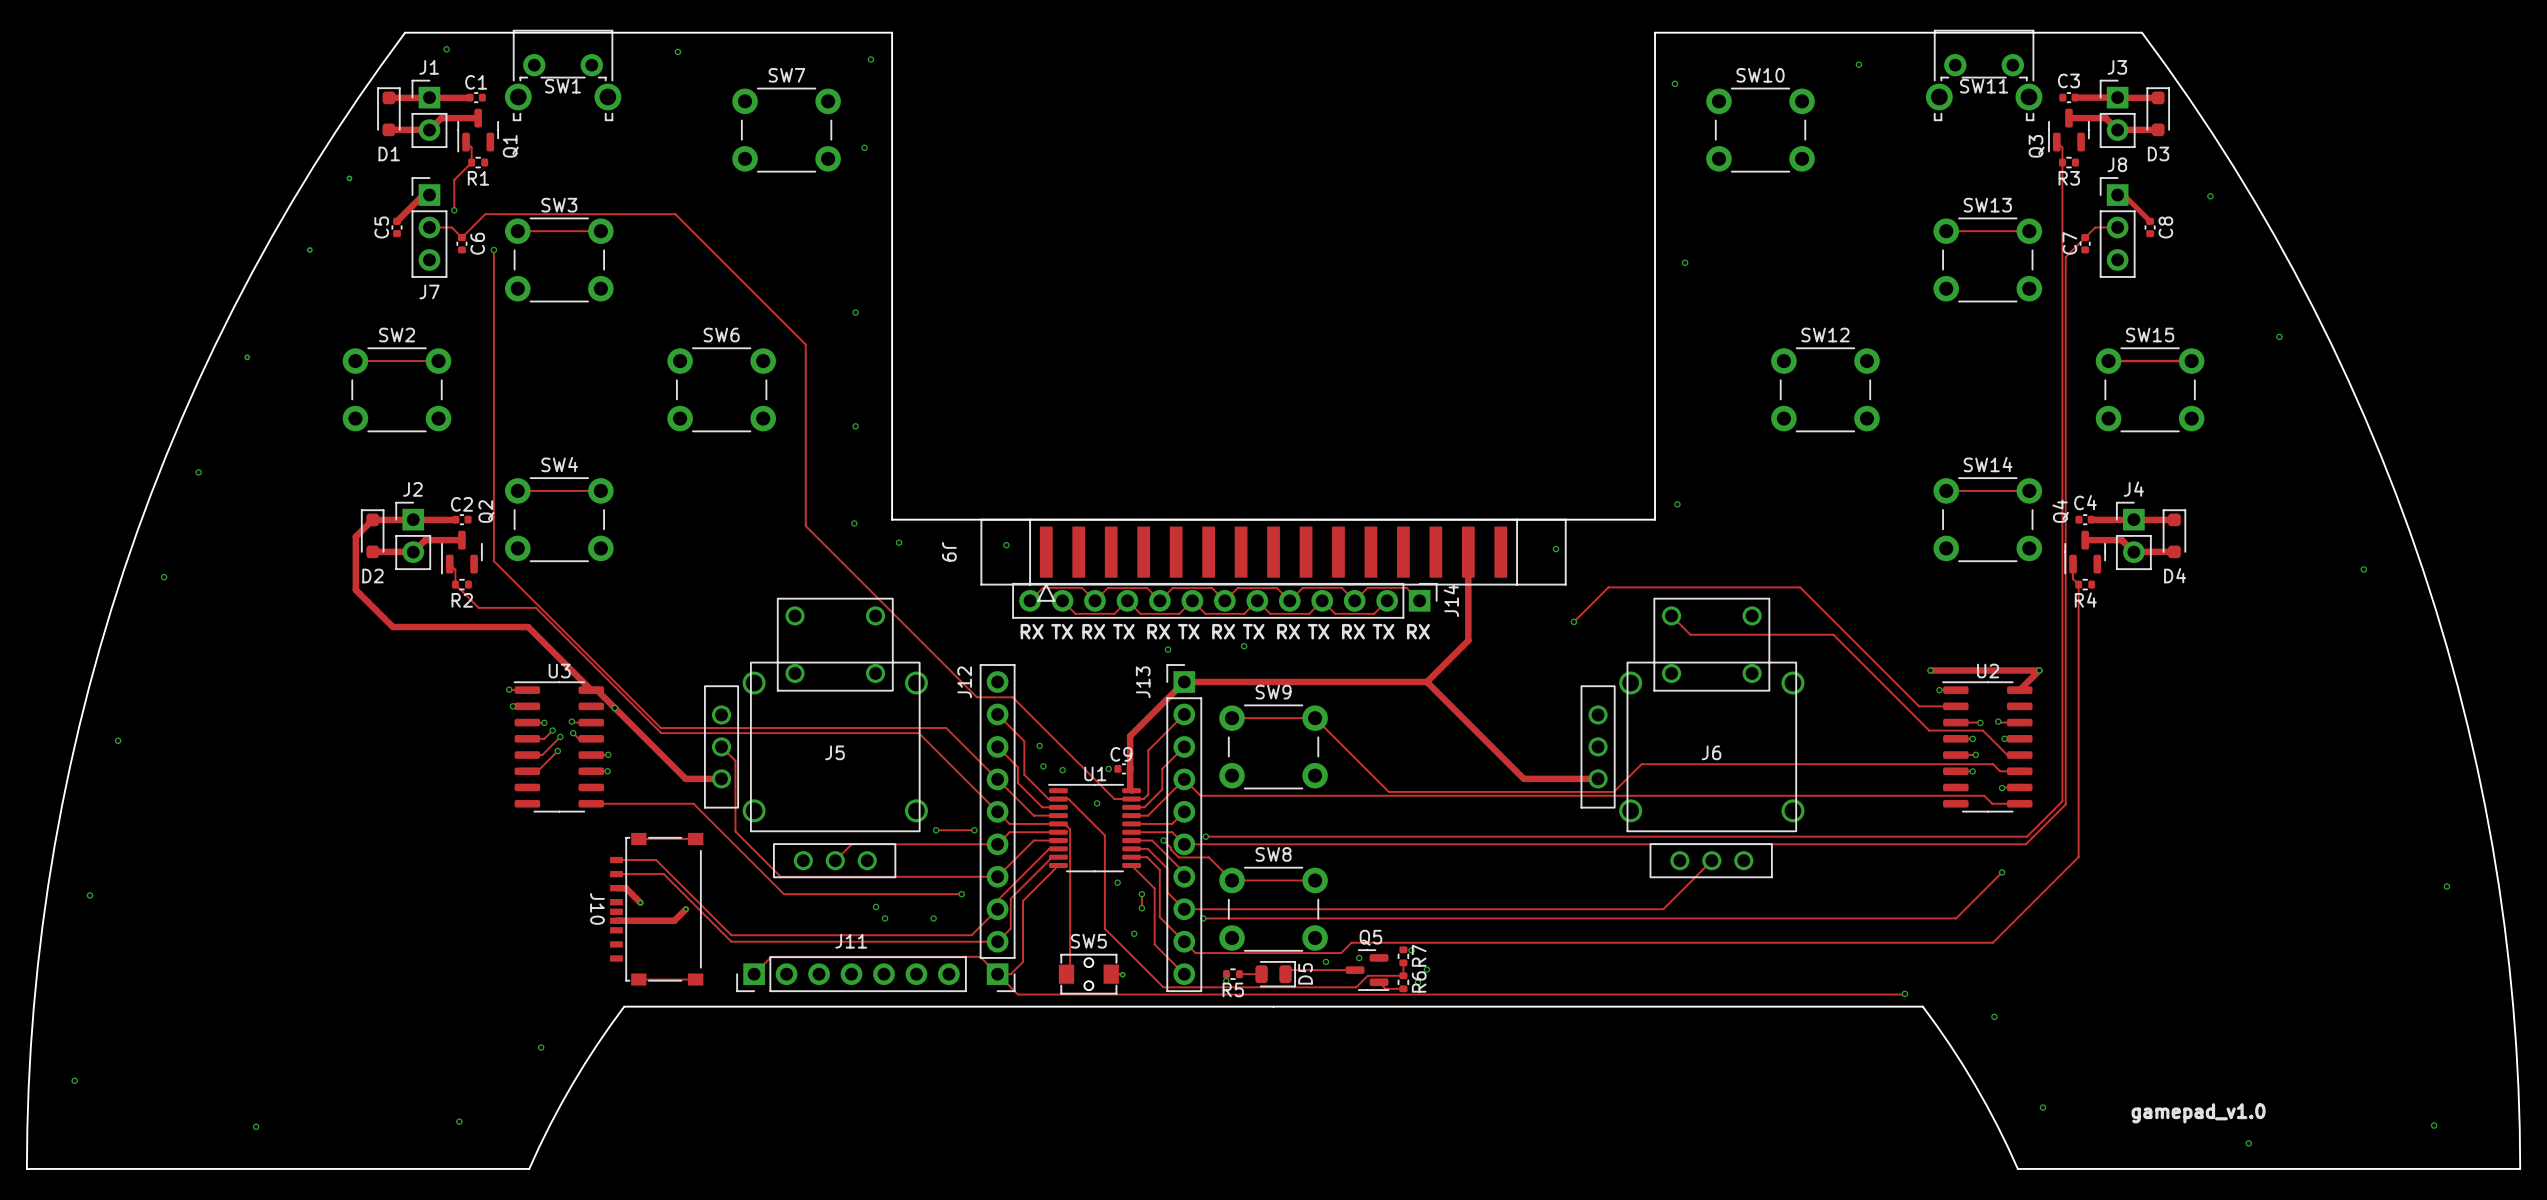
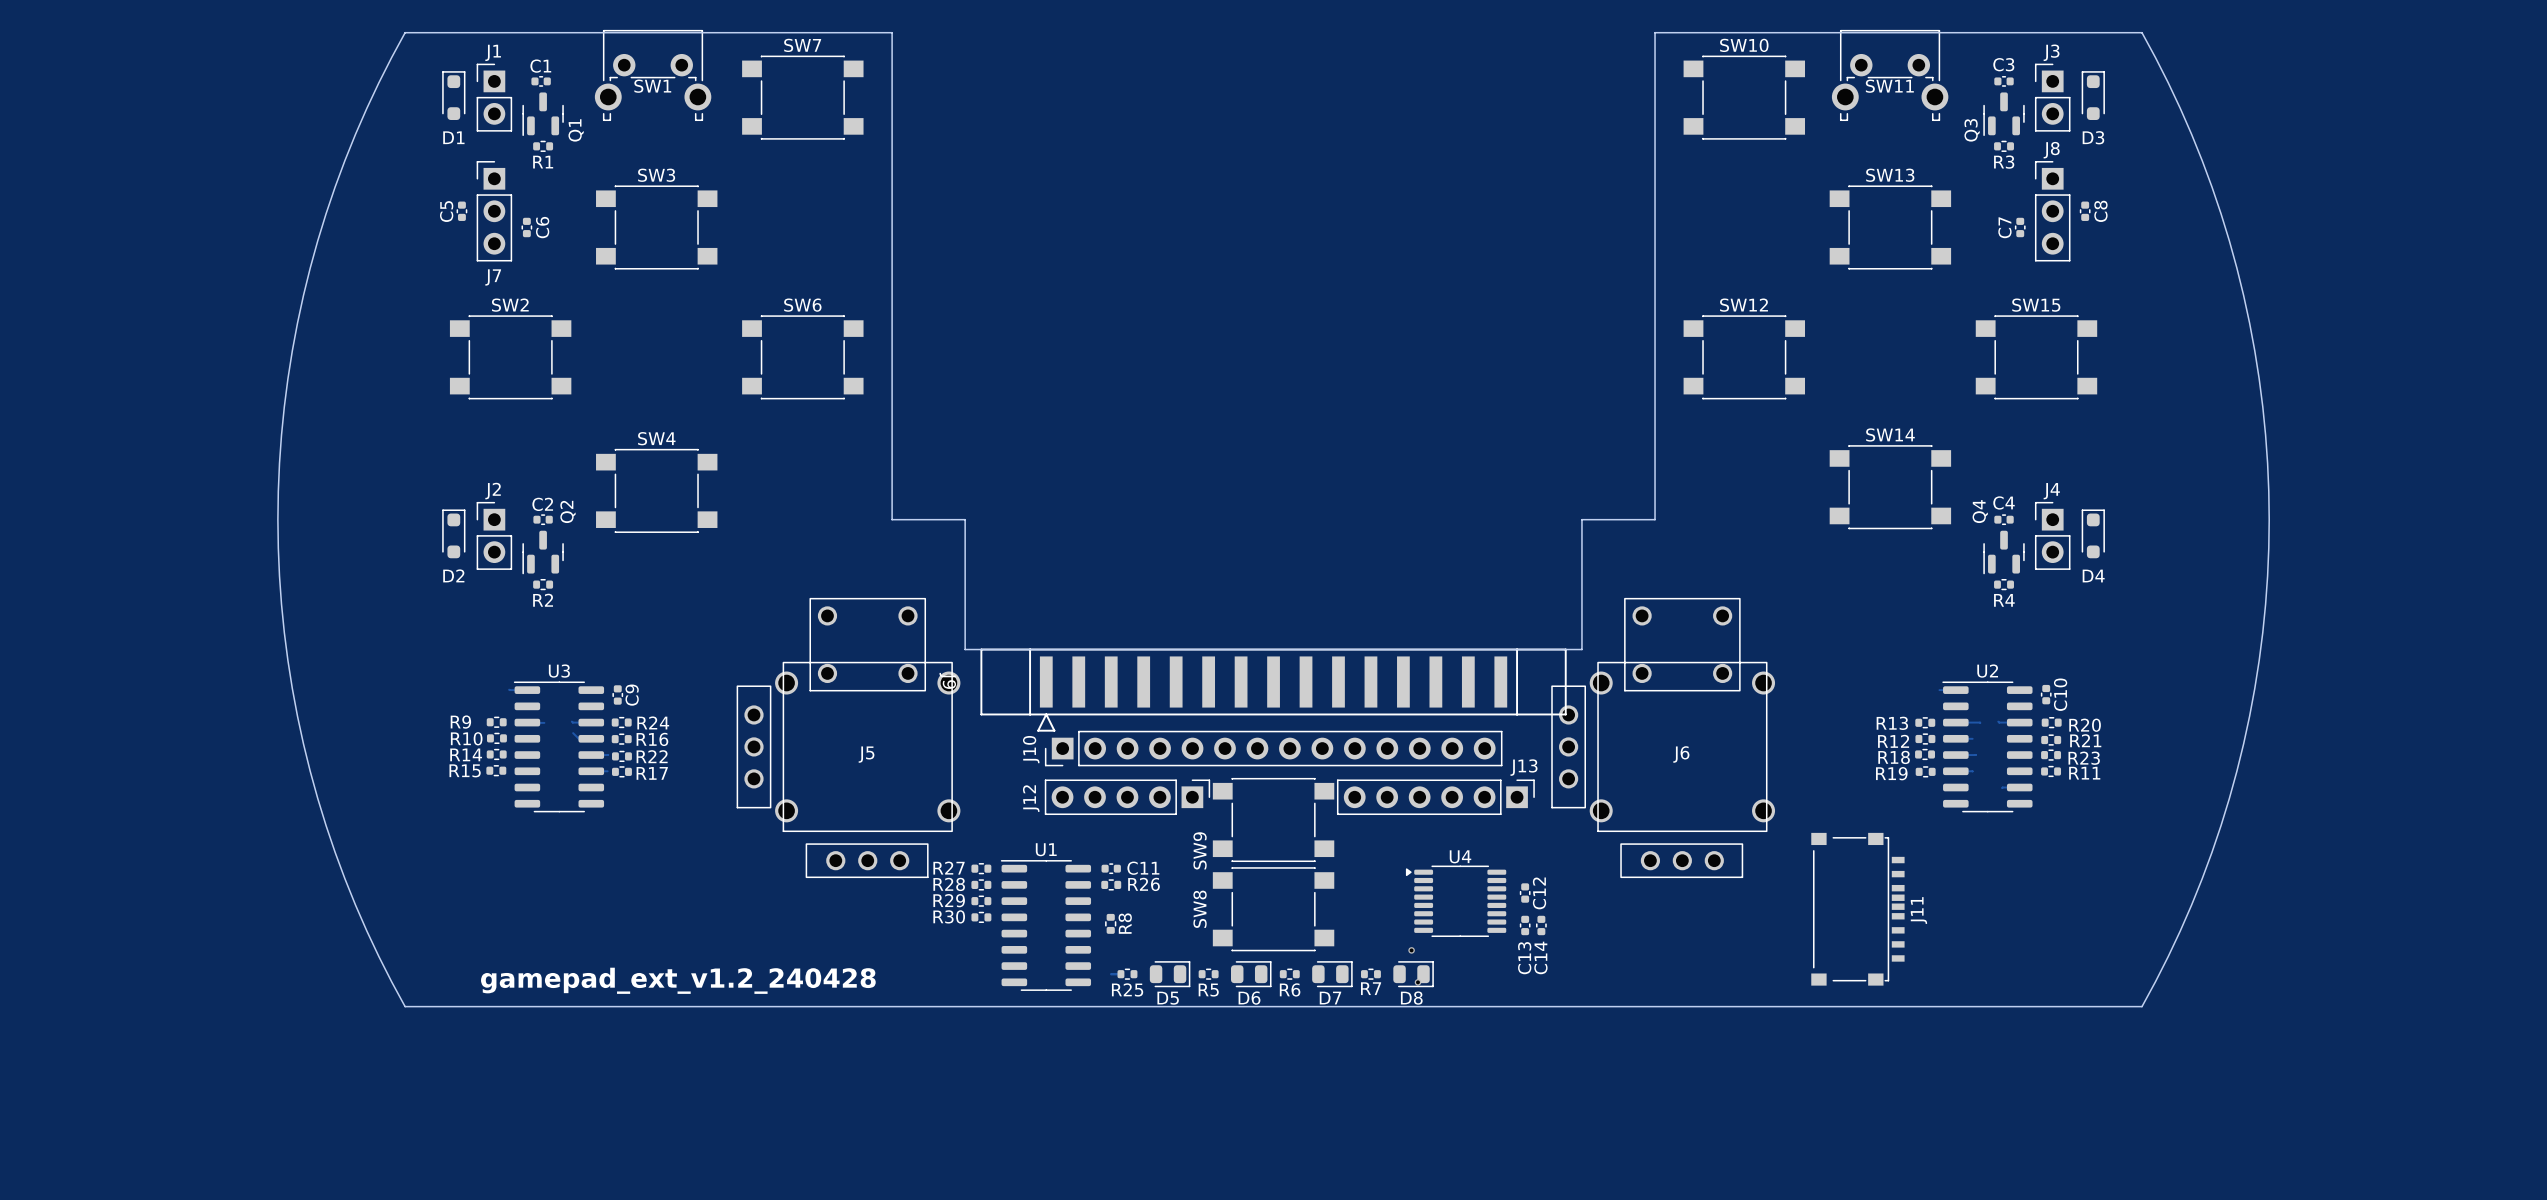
drawing: [26, 31, 2521, 1170] -> none
drawing: none -> [277, 31, 2270, 1008]
via: (446, 49) -> none
via: (677, 51) -> none
via: (870, 59) -> none
via: (1858, 64) -> none
SW1 position: (563, 75) -> (653, 75)
SW11 position: (1984, 75) -> (1890, 75)
via: (1674, 83) -> none
SW7 footprint: [732, 87, 841, 173] -> [742, 55, 864, 140]
SW10 footprint: [1706, 87, 1815, 173] -> [1683, 55, 1806, 140]
track: (470, 97) (388, 97) -> none
C1 position: (476, 97) -> (541, 81)
C3 position: (2068, 97) -> (2004, 81)
track: (2075, 97) (2158, 97) -> none
D1 position: (388, 111) -> (453, 95)
D3 position: (2158, 111) -> (2093, 95)
J1 position: (429, 113) -> (494, 97)
J3 position: (2117, 113) -> (2052, 97)
track: (478, 118) (441, 118) (429, 130) (388, 129) -> none
track: (2068, 118) (2105, 118) (2117, 130) (2158, 129) -> none
Q1 position: (478, 130) -> (543, 114)
Q3 position: (2068, 130) -> (2004, 114)
track: (466, 142) (471, 147) (471, 162) (454, 179) (454, 210) -> none
track: (2056, 142) (2062, 147) (2062, 801) (2027, 836) (1205, 836) -> none
via: (864, 147) -> none
R1 position: (478, 162) -> (543, 146)
R3 position: (2068, 162) -> (2004, 146)
via: (349, 178) -> none
track: (429, 195) (423, 195) (397, 221) -> none
track: (2117, 195) (2123, 195) (2150, 221) -> none
via: (2210, 196) -> none
via: (454, 210) -> none
SW3 footprint: [505, 217, 614, 303] -> [596, 185, 718, 270]
SW13 footprint: [1933, 217, 2043, 303] -> [1829, 185, 1952, 270]
C5 position: (397, 227) -> (461, 211)
track: (429, 227) (451, 227) (461, 237) (485, 214) (675, 214) (805, 344) (805, 526) (977, 697) (1012, 697) (1114, 799) (1143, 799) (1148, 794) (1148, 750) (1184, 714) -> none
J7 position: (429, 227) -> (494, 211)
track: (2117, 227) (2095, 227) (2065, 257) (2065, 804) (2025, 844) (1184, 844) (1172, 832) (1131, 832) -> none
J8 position: (2117, 227) -> (2052, 211)
C8 position: (2150, 227) -> (2085, 211)
track: (517, 231) (600, 231) -> none
track: (1946, 231) (2029, 231) -> none
C6 position: (461, 243) -> (526, 227)
C7 position: (2085, 243) -> (2020, 227)
via: (309, 249) -> none
track: (493, 249) (493, 561) (660, 728) (946, 728) (1033, 815) (1058, 815) -> none
via: (493, 249) -> none
via: (1685, 262) -> none
via: (855, 312) -> none
via: (2279, 336) -> none
SW2 footprint: [342, 347, 452, 433] -> [449, 315, 572, 400]
SW6 footprint: [667, 347, 776, 433] -> [742, 315, 864, 400]
SW12 footprint: [1771, 347, 1880, 433] -> [1683, 315, 1806, 400]
SW15 footprint: [2095, 347, 2205, 433] -> [1975, 315, 2098, 400]
via: (247, 357) -> none
track: (355, 361) (438, 361) -> none
track: (2108, 361) (2191, 361) -> none
via: (855, 426) -> none
via: (198, 472) -> none
SW4 footprint: [505, 477, 614, 562] -> [596, 448, 718, 533]
SW14 footprint: [1933, 477, 2043, 562] -> [1829, 445, 1952, 530]
track: (517, 490) (600, 490) -> none
track: (1946, 490) (2029, 490) -> none
via: (1677, 504) -> none
track: (455, 519) (372, 519) (355, 536) (355, 589) (392, 627) (528, 627) (591, 690) (596, 690) (685, 778) (721, 778) -> none
C2 position: (461, 519) -> (543, 519)
C4 position: (2085, 519) -> (2004, 519)
track: (2091, 519) (2174, 519) -> none
via: (854, 523) -> none
D2 position: (372, 533) -> (453, 533)
D4 position: (2174, 533) -> (2093, 533)
J2 position: (413, 535) -> (494, 535)
J4 position: (2133, 535) -> (2052, 535)
track: (461, 540) (425, 540) (413, 552) (372, 551) -> none
track: (2085, 540) (2121, 540) (2133, 552) (2174, 551) -> none
via: (899, 542) -> none
via: (1006, 545) -> none
via: (1556, 549) -> none
Q2 position: (461, 552) -> (543, 552)
track: (1468, 552) (1468, 640) (1426, 682) -> none
Q4 position: (2085, 552) -> (2004, 552)
J9 position: (1273, 560) -> (1273, 690)
track: (449, 564) (455, 569) (455, 584) (478, 607) (536, 607) (661, 733) (918, 733) (1009, 823) (1064, 823) (1070, 829) (1070, 970) (1066, 974) -> none
track: (2073, 564) (2073, 578) (2078, 584) (2078, 856) (1992, 942) (1351, 942) (1341, 953) (1195, 953) (1159, 917) (1159, 869) (1147, 857) (1131, 857) -> none
via: (2363, 569) -> none
via: (164, 577) -> none
R2 position: (461, 584) -> (543, 584)
R4 position: (2085, 584) -> (2004, 584)
track: (1030, 600) (1043, 587) (1082, 587) (1095, 600) (1107, 588) (1147, 588) (1159, 600) (1172, 588) (1212, 588) (1224, 600) (1237, 588) (1276, 588) (1289, 600) (1302, 587) (1341, 587) (1354, 600) (1367, 587) (1406, 587) (1419, 600) -> none
track: (1062, 600) (1075, 613) (1114, 613) (1127, 600) (1140, 613) (1179, 613) (1192, 600) (1205, 613) (1244, 613) (1257, 600) (1270, 613) (1309, 613) (1322, 600) (1335, 613) (1374, 613) (1387, 600) -> none
J14: (1224, 600) -> none
track: (1671, 615) (1690, 634) (1833, 634) (1929, 730) (1982, 730) (2007, 755) (2019, 755) -> none
track: (1573, 621) (1608, 587) (1800, 587) (1919, 706) (1955, 706) -> none
via: (1573, 621) -> none
text: RX (1032, 631) -> none
text: TX (1062, 631) -> none
text: RX (1093, 631) -> none
text: TX (1123, 631) -> none
text: RX (1158, 631) -> none
text: TX (1188, 631) -> none
text: RX (1223, 631) -> none
text: TX (1253, 631) -> none
text: RX (1288, 631) -> none
text: TX (1318, 631) -> none
text: RX (1353, 631) -> none
text: TX (1383, 631) -> none
text: RX (1418, 631) -> none
via: (1244, 646) -> none
via: (1168, 649) -> none
J12 footprint: [979, 664, 1016, 992] -> [1044, 779, 1211, 816]
J13 footprint: [1166, 664, 1203, 992] -> [1336, 779, 1535, 816]
track: (1930, 670) (2039, 670) (2019, 690) -> none
via: (1930, 670) -> none
via: (2039, 670) -> none
J12 name position: J12 (964, 682) -> J12 (1031, 798)
J13 name position: J13 (1143, 682) -> J13 (1524, 767)
track: (1426, 682) (1523, 778) (1598, 778) -> none
track: (1426, 682) (1184, 682) (1130, 736) (1131, 790) -> none
via: (509, 689) -> none
via: (1939, 690) -> none
SW9 name position: SW9 (1273, 692) -> SW9 (1200, 850)
C10: none -> (2046, 694)
SW9 footprint: [1219, 704, 1328, 790] -> [1212, 777, 1335, 863]
via: (513, 706) -> none
via: (614, 708) -> none
track: (997, 714) (1024, 741) (1024, 774) (1048, 799) (1068, 799) (1104, 835) (1104, 928) (1163, 987) (1356, 987) (1367, 975) (1403, 975) (1403, 962) -> none
track: (1232, 718) (1315, 718) (1388, 791) (1613, 791) (1641, 764) (1993, 764) (2000, 771) (2019, 771) -> none
via: (571, 721) -> none
via: (1998, 721) -> none
R9: none -> (496, 722)
via: (544, 722) -> none
R24: none -> (621, 722)
R13: none -> (1925, 722)
via: (1980, 722) -> none
R20: none -> (2051, 722)
track: (552, 730) (544, 738) (527, 738) -> none
via: (552, 730) -> none
via: (573, 733) -> none
track: (560, 736) (542, 755) (527, 755) -> none
via: (560, 736) -> none
J5 position: (816, 737) -> (848, 737)
J6 position: (1692, 737) -> (1663, 737)
R10: none -> (496, 738)
via: (1972, 738) -> none
via: (2004, 738) -> none
R16: none -> (621, 739)
R12: none -> (1925, 739)
via: (118, 740) -> none
R21: none -> (2051, 740)
via: (1039, 745) -> none
track: (721, 746) (735, 760) (735, 831) (780, 876) (997, 876) (1033, 840) (1058, 840) -> none
track: (997, 746) (1017, 767) (1017, 782) (1042, 807) (1058, 807) -> none
track: (1184, 746) (1162, 768) (1162, 789) (1144, 807) (1131, 807) -> none
track: (557, 751) (537, 771) (527, 771) -> none
via: (557, 751) -> none
R14: none -> (496, 754)
via: (608, 754) -> none
R18: none -> (1925, 754)
via: (1975, 754) -> none
R23: none -> (2051, 755)
R22: none -> (621, 756)
via: (1043, 766) -> none
via: (1108, 768) -> none
C9 rotation: 0° (1124, 768) -> 90° clockwise (617, 694)
C9 position: (1124, 768) -> (617, 694)
R15: none -> (496, 770)
via: (1062, 770) -> none
via: (607, 771) -> none
R17: none -> (621, 771)
R19: none -> (1925, 771)
via: (1972, 771) -> none
R11: none -> (2051, 771)
U1 footprint: [1048, 784, 1142, 873] -> [1000, 860, 1092, 991]
via: (2002, 788) -> none
track: (591, 803) (693, 803) (784, 894) (961, 894) -> none
via: (1097, 803) -> none
track: (2019, 803) (1992, 803) (1984, 795) (1200, 795) (1184, 779) (1148, 815) (1131, 815) -> none
track: (1184, 811) (1172, 823) (1131, 823) -> none
track: (936, 830) (974, 830) -> none
via: (936, 830) -> none
via: (974, 830) -> none
J10 footprint: [610, 832, 704, 986] -> [1044, 730, 1503, 767]
track: (1058, 832) (1009, 832) (997, 844) (851, 844) (835, 860) -> none
via: (1205, 836) -> none
track: (633, 838) (690, 838) -> none
track: (1131, 840) (1152, 840) (1184, 872) (1184, 876) -> none
track: (1163, 840) (1178, 857) (1208, 857) (1232, 880) (1315, 880) -> none
via: (1163, 840) -> none
track: (1058, 848) (1049, 848) (997, 900) (997, 909) (971, 935) (731, 935) (656, 860) (616, 860) -> none
track: (1131, 848) (1147, 848) (1167, 868) (1167, 892) (1184, 909) (1663, 909) (1711, 860) -> none
SW8 name position: SW8 (1273, 854) -> SW8 (1200, 909)
track: (1058, 857) (1052, 857) (1010, 898) (1010, 928) (997, 941) (731, 941) (663, 874) (616, 874) -> none
track: (1058, 865) (1023, 900) (1023, 961) (1010, 974) (997, 974) -> none
track: (1131, 865) (1154, 888) (1154, 944) (1184, 974) -> none
SW8 footprint: [1219, 866, 1328, 952] -> [1212, 867, 1335, 952]
R27: none -> (981, 868)
C11: none -> (1111, 868)
track: (2002, 872) (1956, 918) (1203, 918) -> none
via: (2002, 872) -> none
via: (1117, 882) -> none
R28: none -> (981, 884)
R26: none -> (1111, 884)
via: (2446, 886) -> none
track: (616, 888) (625, 888) (640, 902) -> none
C12: none -> (1525, 893)
via: (961, 894) -> none
track: (1141, 894) (1141, 908) -> none
via: (1141, 894) -> none
via: (90, 895) -> none
R29: none -> (981, 901)
U4: none -> (1456, 901)
via: (640, 902) -> none
via: (876, 906) -> none
J10 name position: J10 (597, 908) -> J10 (1031, 749)
via: (1141, 908) -> none
track: (685, 909) (674, 920) (616, 920) -> none
via: (685, 909) -> none
R30: none -> (981, 917)
via: (885, 918) -> none
via: (933, 918) -> none
via: (1203, 918) -> none
R8: none -> (1110, 923)
C13: none -> (1525, 925)
C14: none -> (1541, 925)
via: (1134, 933) -> none
J11 name position: J11 (851, 941) -> J11 (1918, 910)
J11 footprint: [736, 956, 967, 992] -> [1811, 832, 1905, 986]
R7 rotation: 0° (1403, 956) -> 90° clockwise (1370, 974)
R7 position: (1403, 956) -> (1370, 974)
via: (1359, 958) -> none
via: (1325, 961) -> none
via: (1426, 969) -> none
track: (1355, 970) (1289, 970) (1285, 974) -> none
Q5: (1367, 970) -> none
D5 name rotation: 0° (1305, 973) -> 90° clockwise (1168, 998)
D5 name position: D5 (1305, 973) -> D5 (1168, 998)
track: (754, 974) (771, 956) (980, 956) (1017, 994) (1904, 993) -> none
SW5: (1088, 974) -> none
via: (1122, 974) -> none
R25: none -> (1127, 974)
R5 position: (1232, 974) -> (1208, 974)
track: (1239, 974) (1261, 974) -> none
D6: none -> (1251, 974)
D5 position: (1275, 974) -> (1170, 974)
D7: none -> (1332, 974)
D8: none -> (1413, 974)
track: (633, 979) (690, 979) -> none
text: none -> gamepad_ext_v1.2_240428 (678, 980)
via: (1226, 981) -> none
track: (1379, 982) (1385, 988) (1403, 988) -> none
R6 rotation: 0° (1403, 982) -> 90° clockwise (1289, 974)
R6 position: (1403, 982) -> (1289, 974)
via: (1904, 993) -> none
via: (1994, 1016) -> none
via: (541, 1047) -> none
via: (74, 1080) -> none
via: (2042, 1107) -> none
text: gamepad_v1.0 (2198, 1113) -> none
via: (459, 1121) -> none
via: (2434, 1125) -> none
via: (256, 1126) -> none
via: (2248, 1143) -> none

